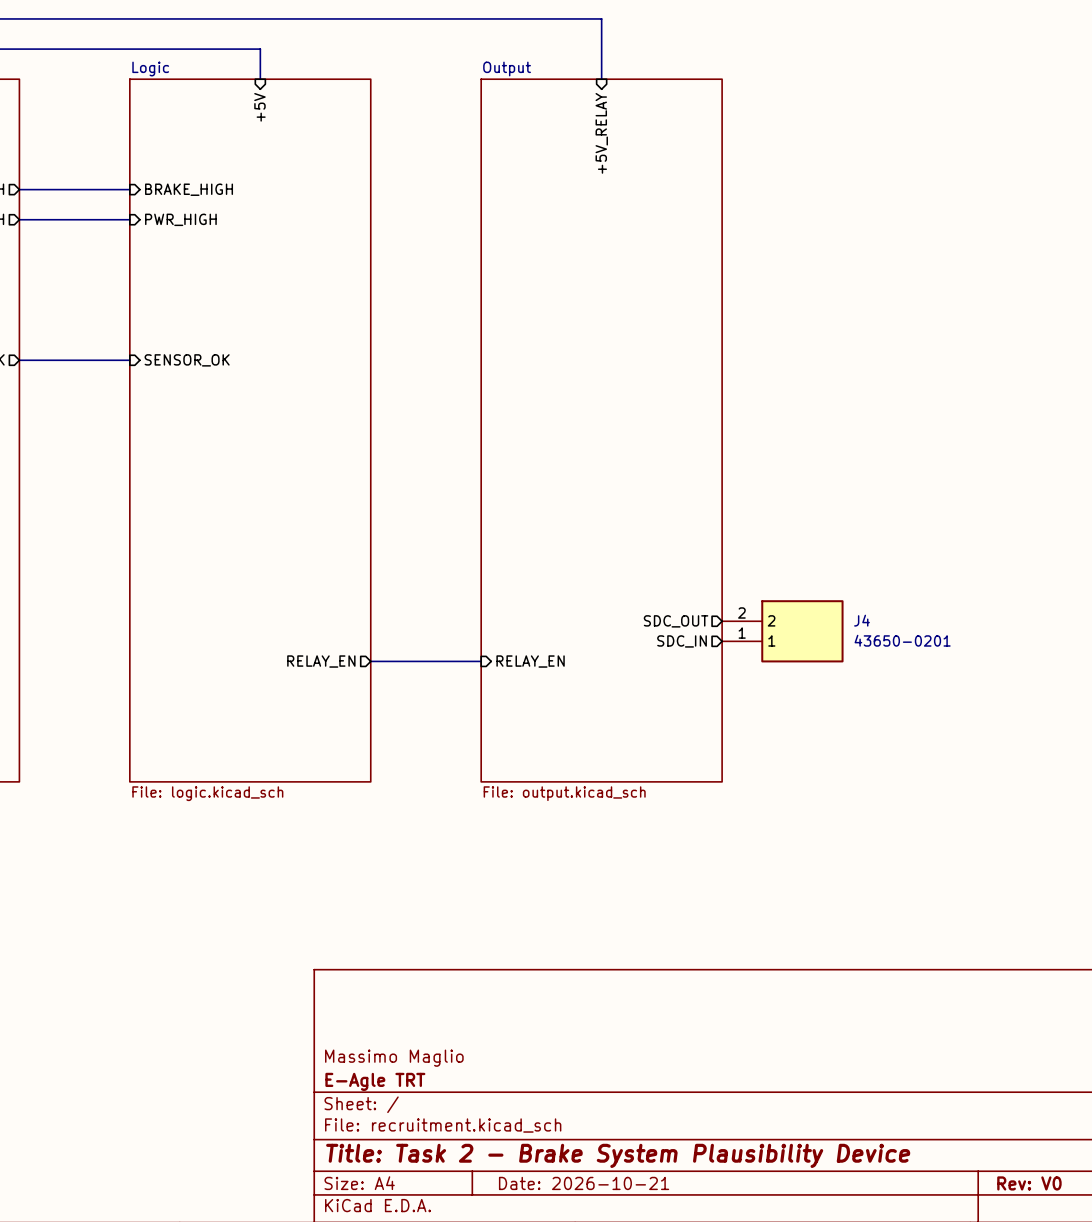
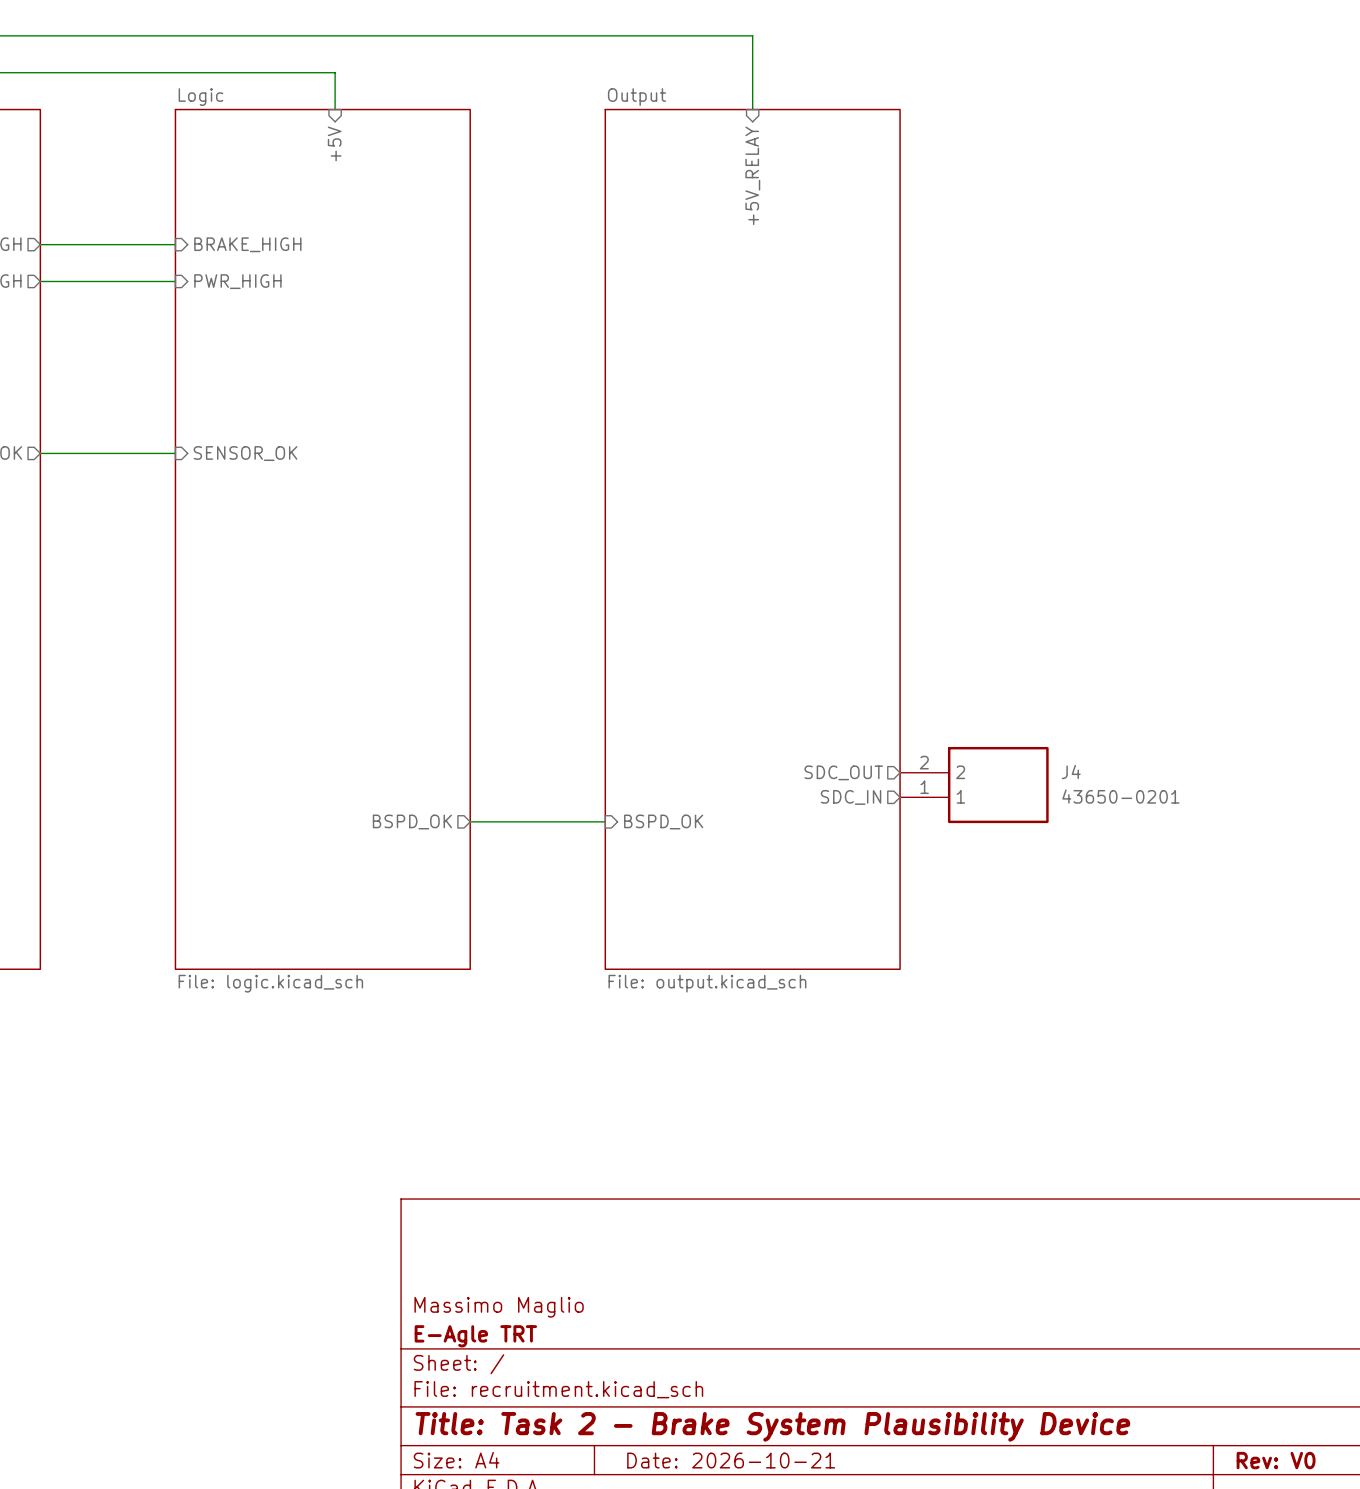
sheet pin: RELAY_EN (321, 661) -> BSPD_OK (412, 822)
sheet pin: RELAY_EN (530, 661) -> BSPD_OK (663, 822)

